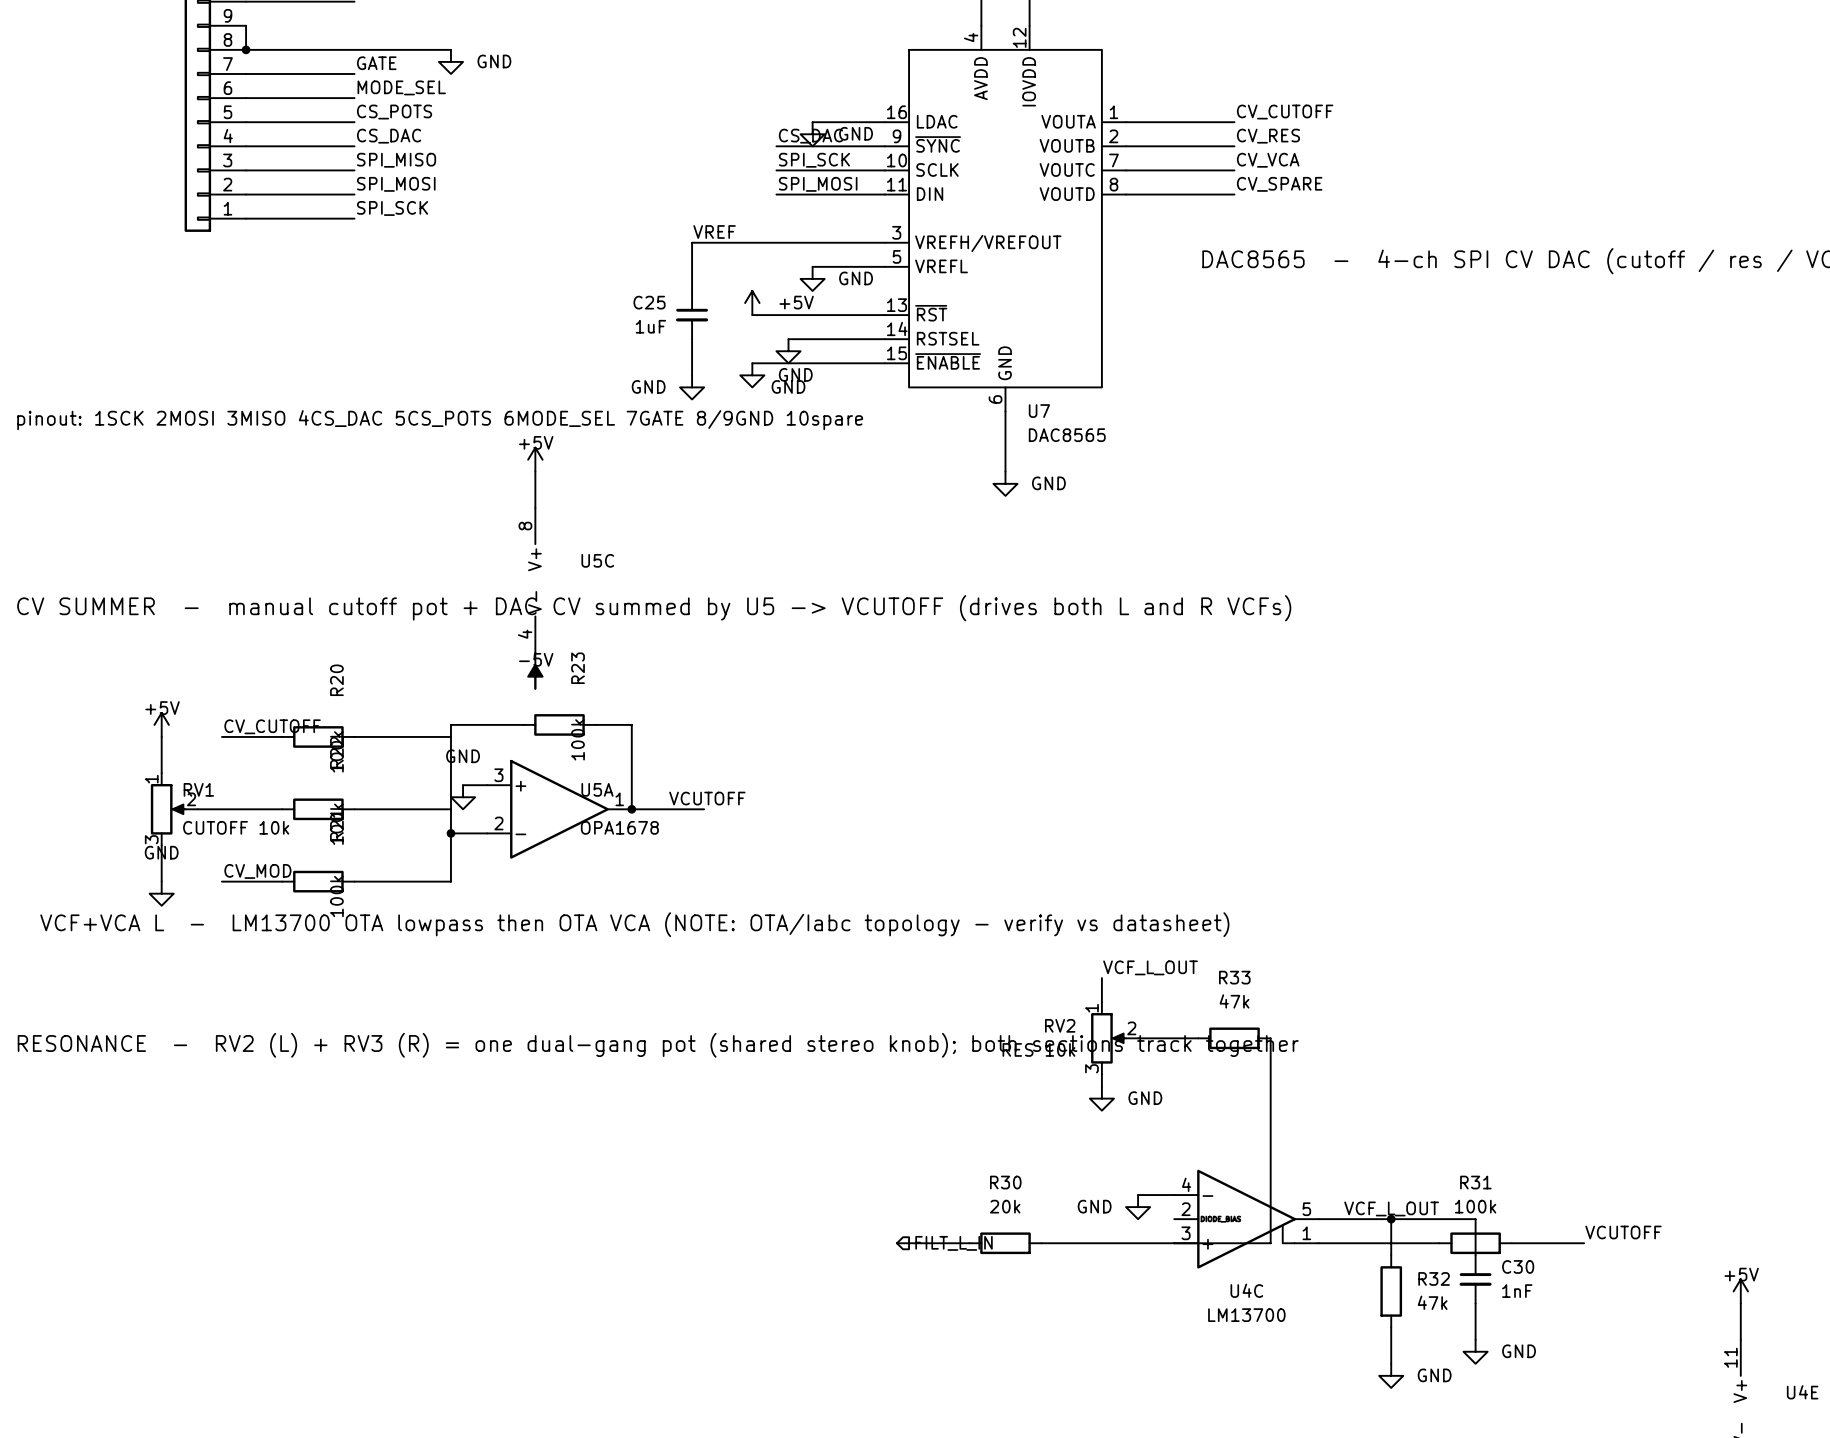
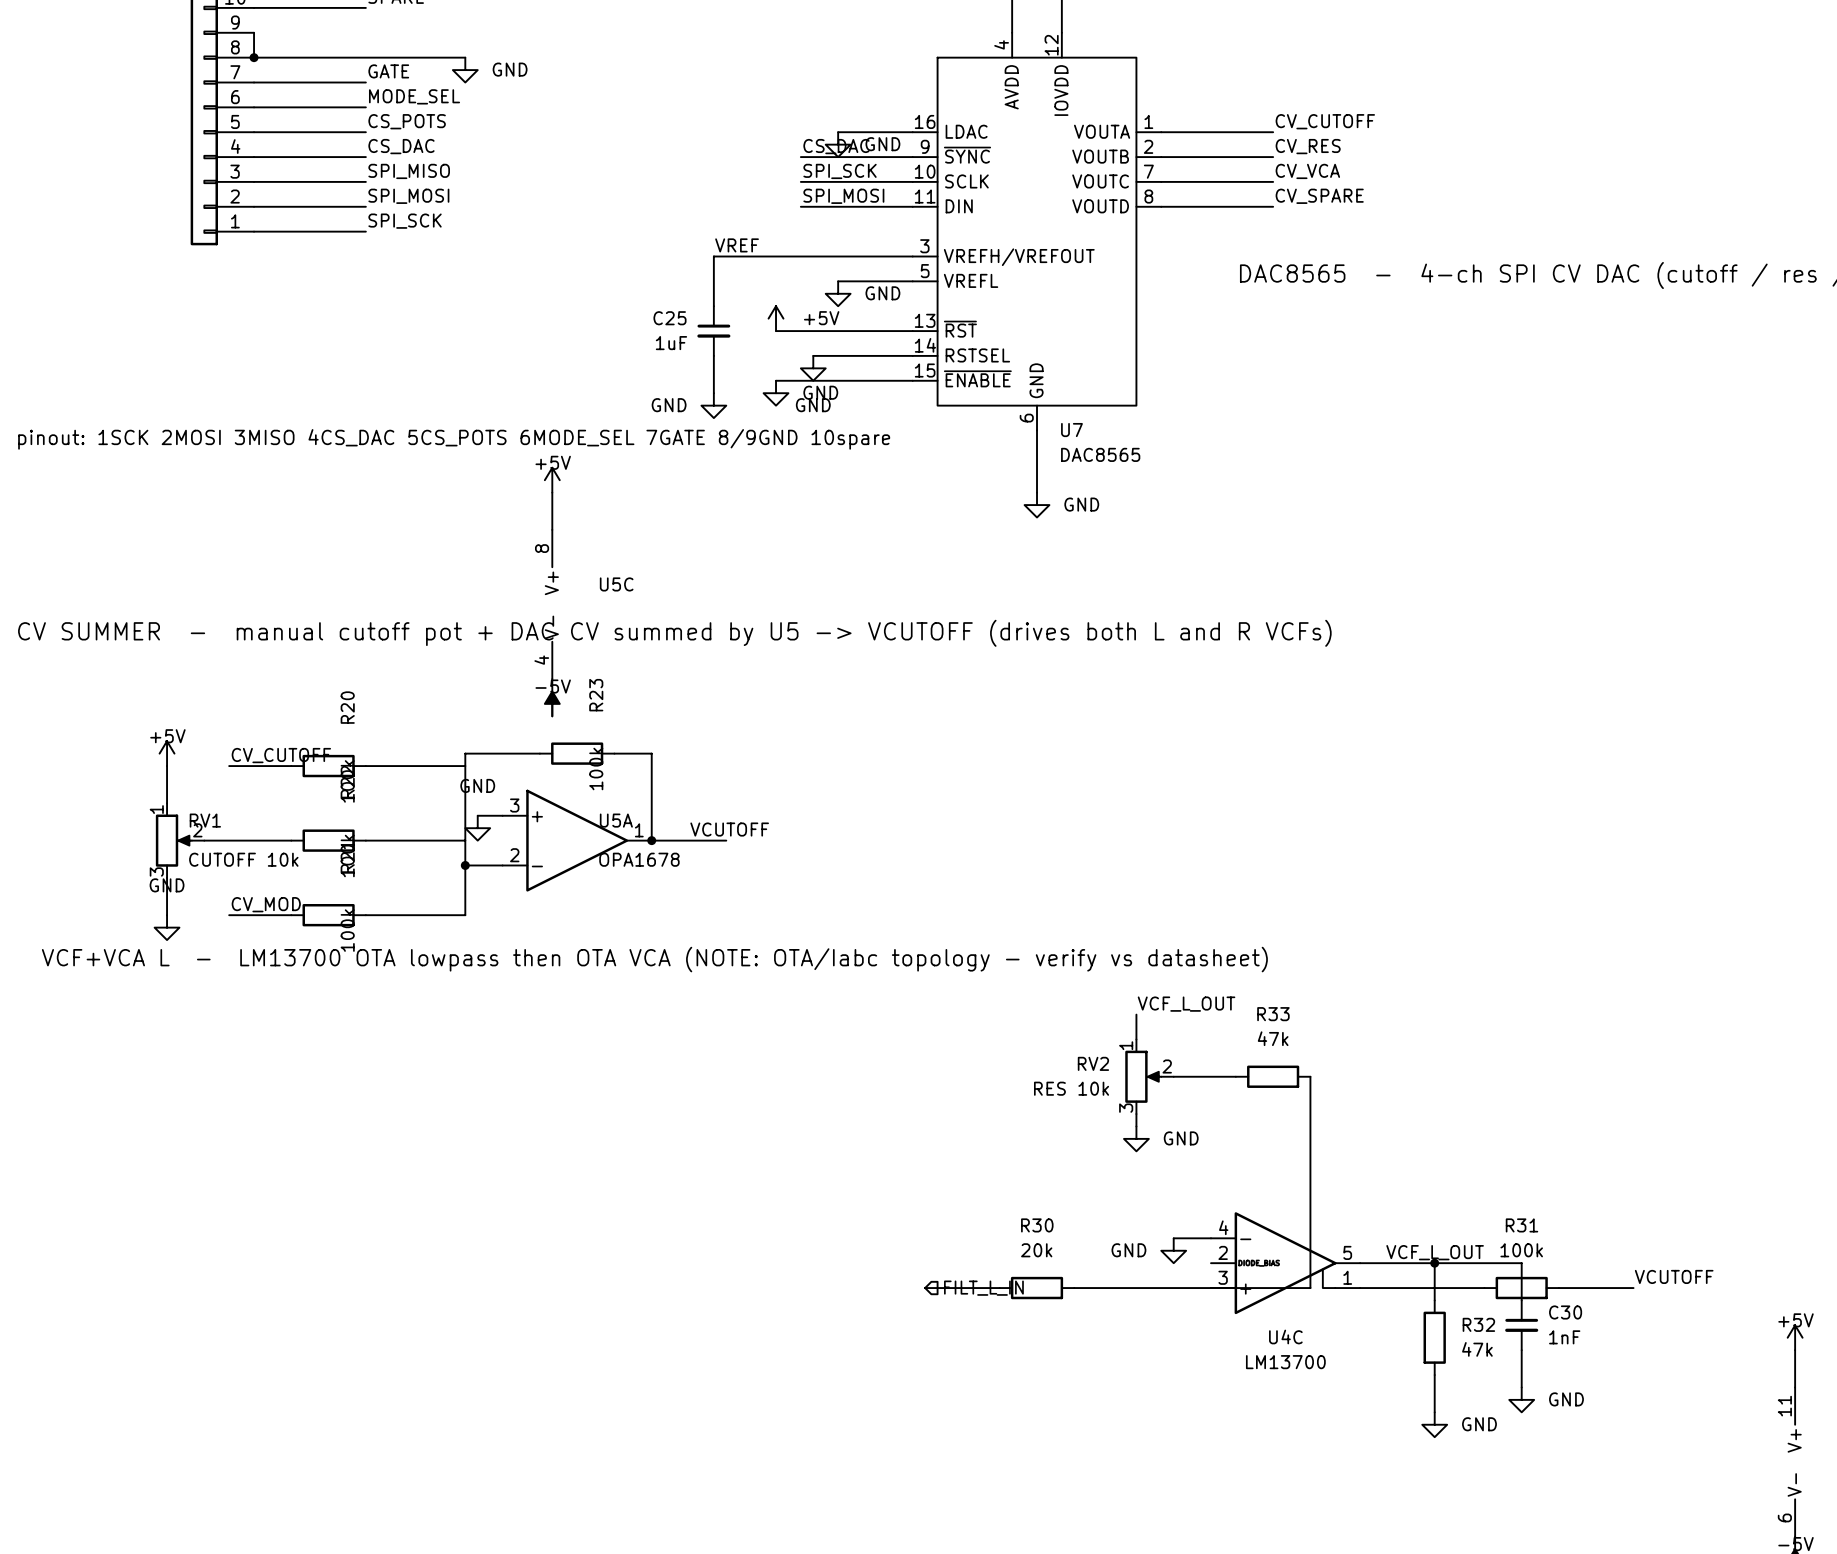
text: RESONANCE - RV2 (L) + RV3 (R) = one dual-gang pot (shared stereo knob); both sections track together (658, 1045) -> none

